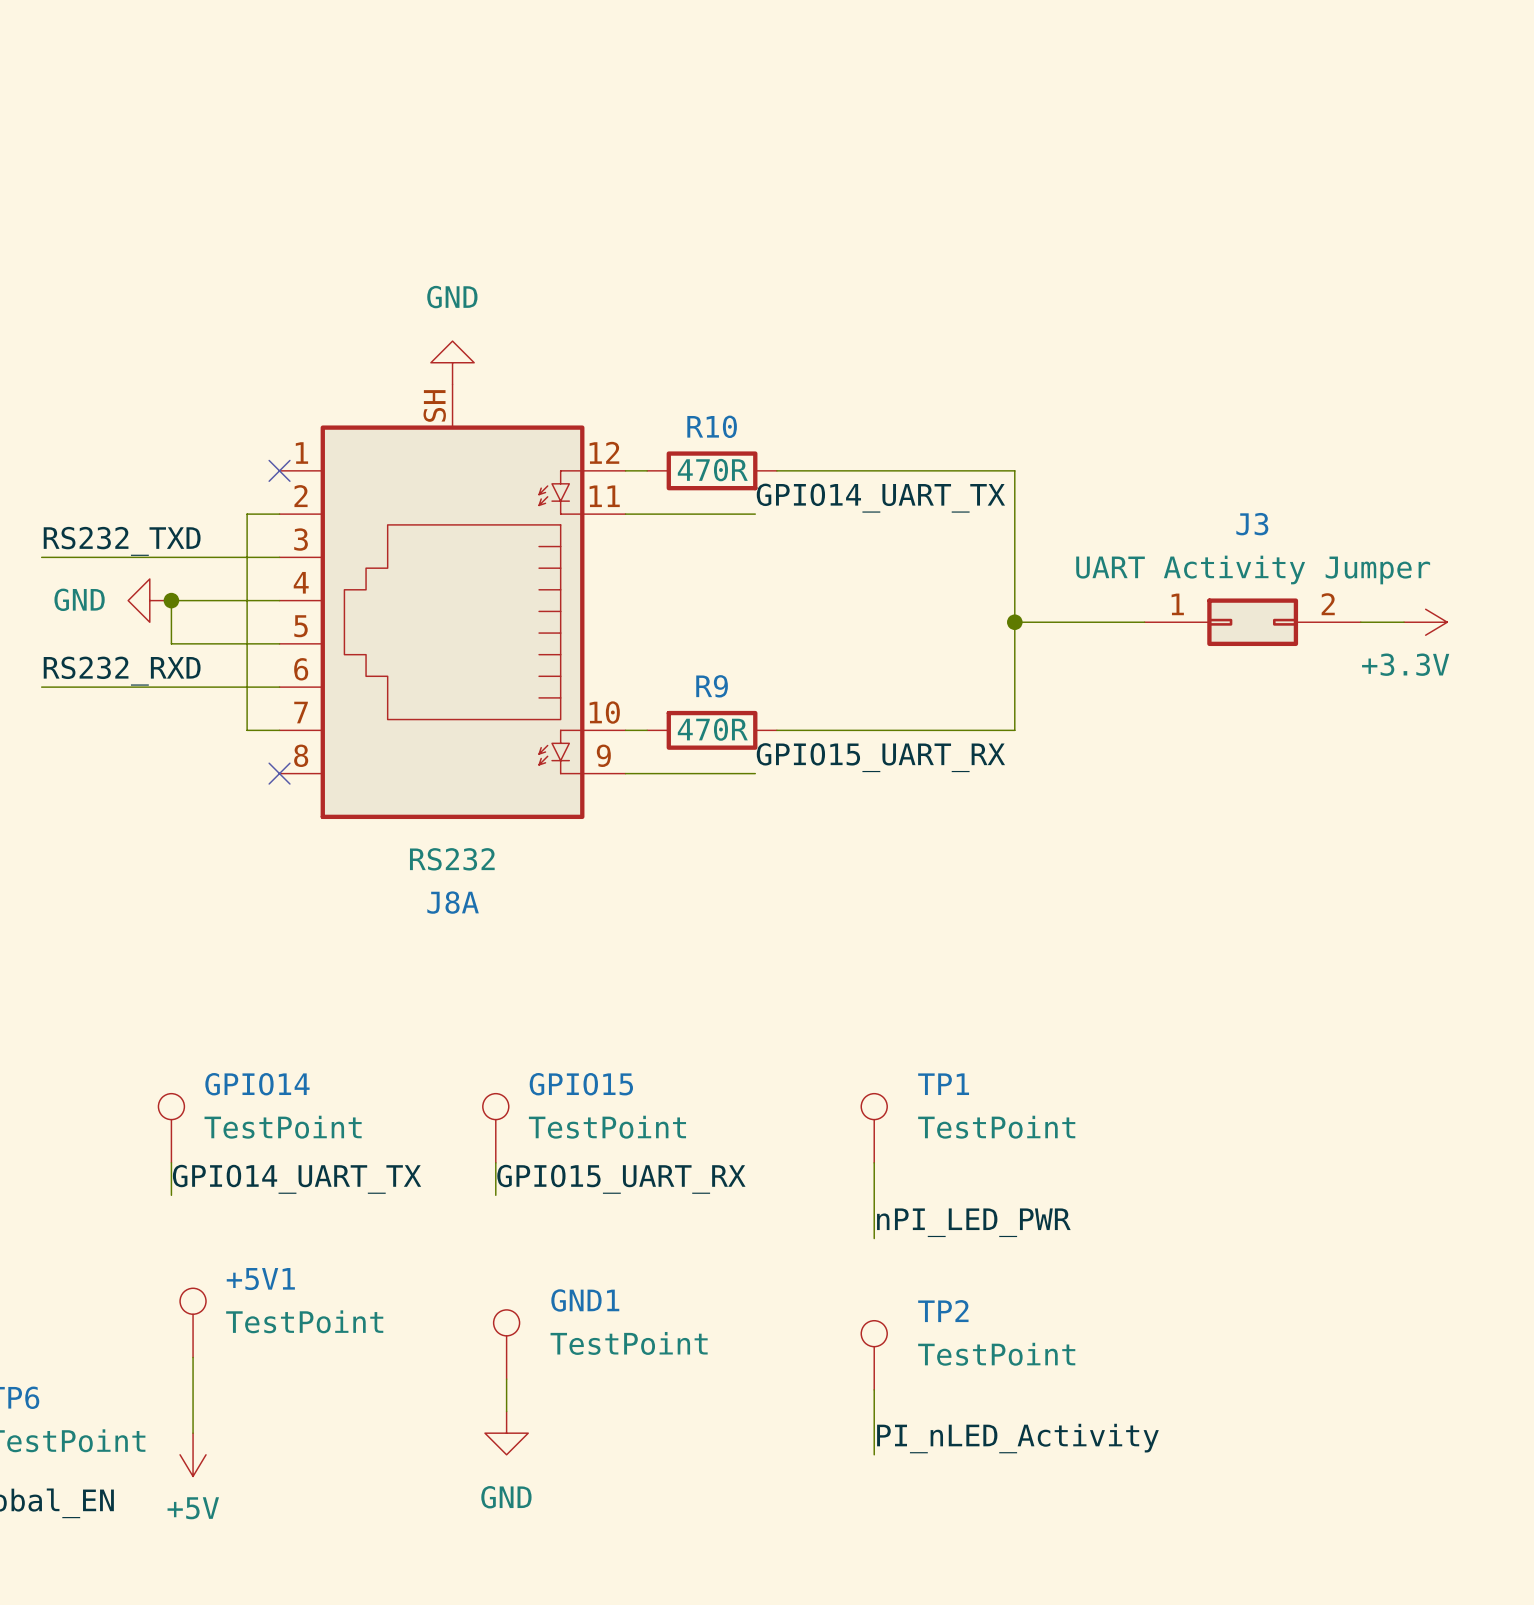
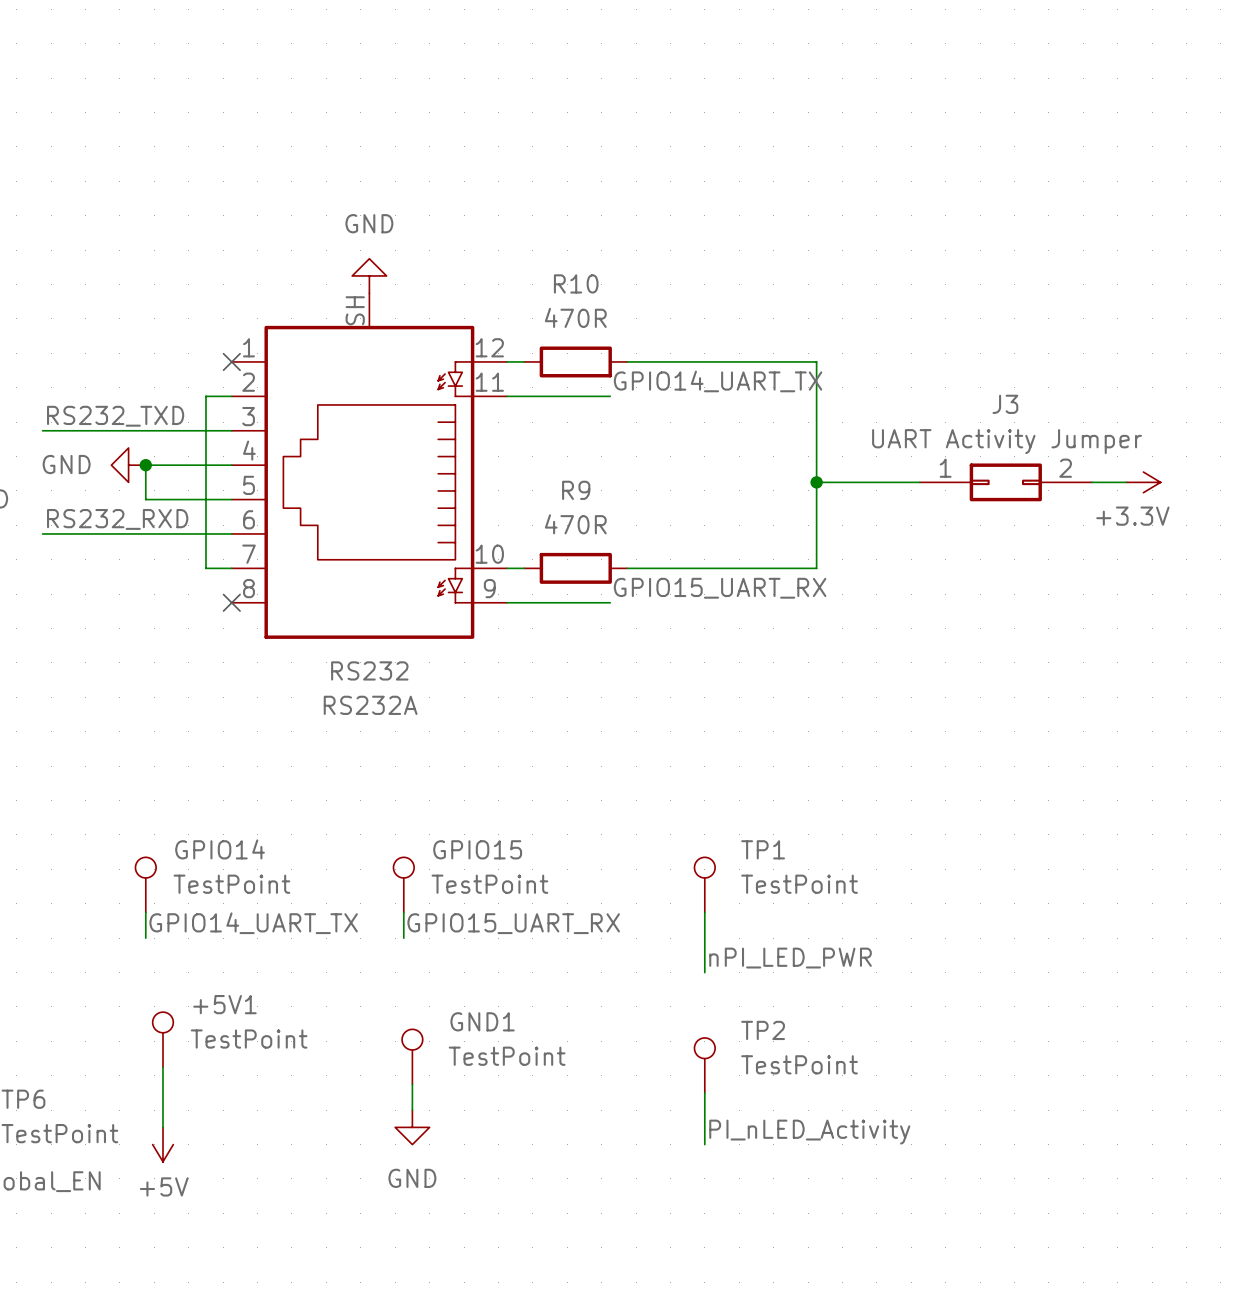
R10 name position: R10 (712, 426) -> R10 (576, 283)
R10 value position: 470R (712, 470) -> 470R (575, 317)
R9 name position: R9 (712, 686) -> R9 (576, 490)
R9 value position: 470R (712, 729) -> 470R (575, 524)
J8A name: J8A (453, 902) -> RS232A (370, 705)

